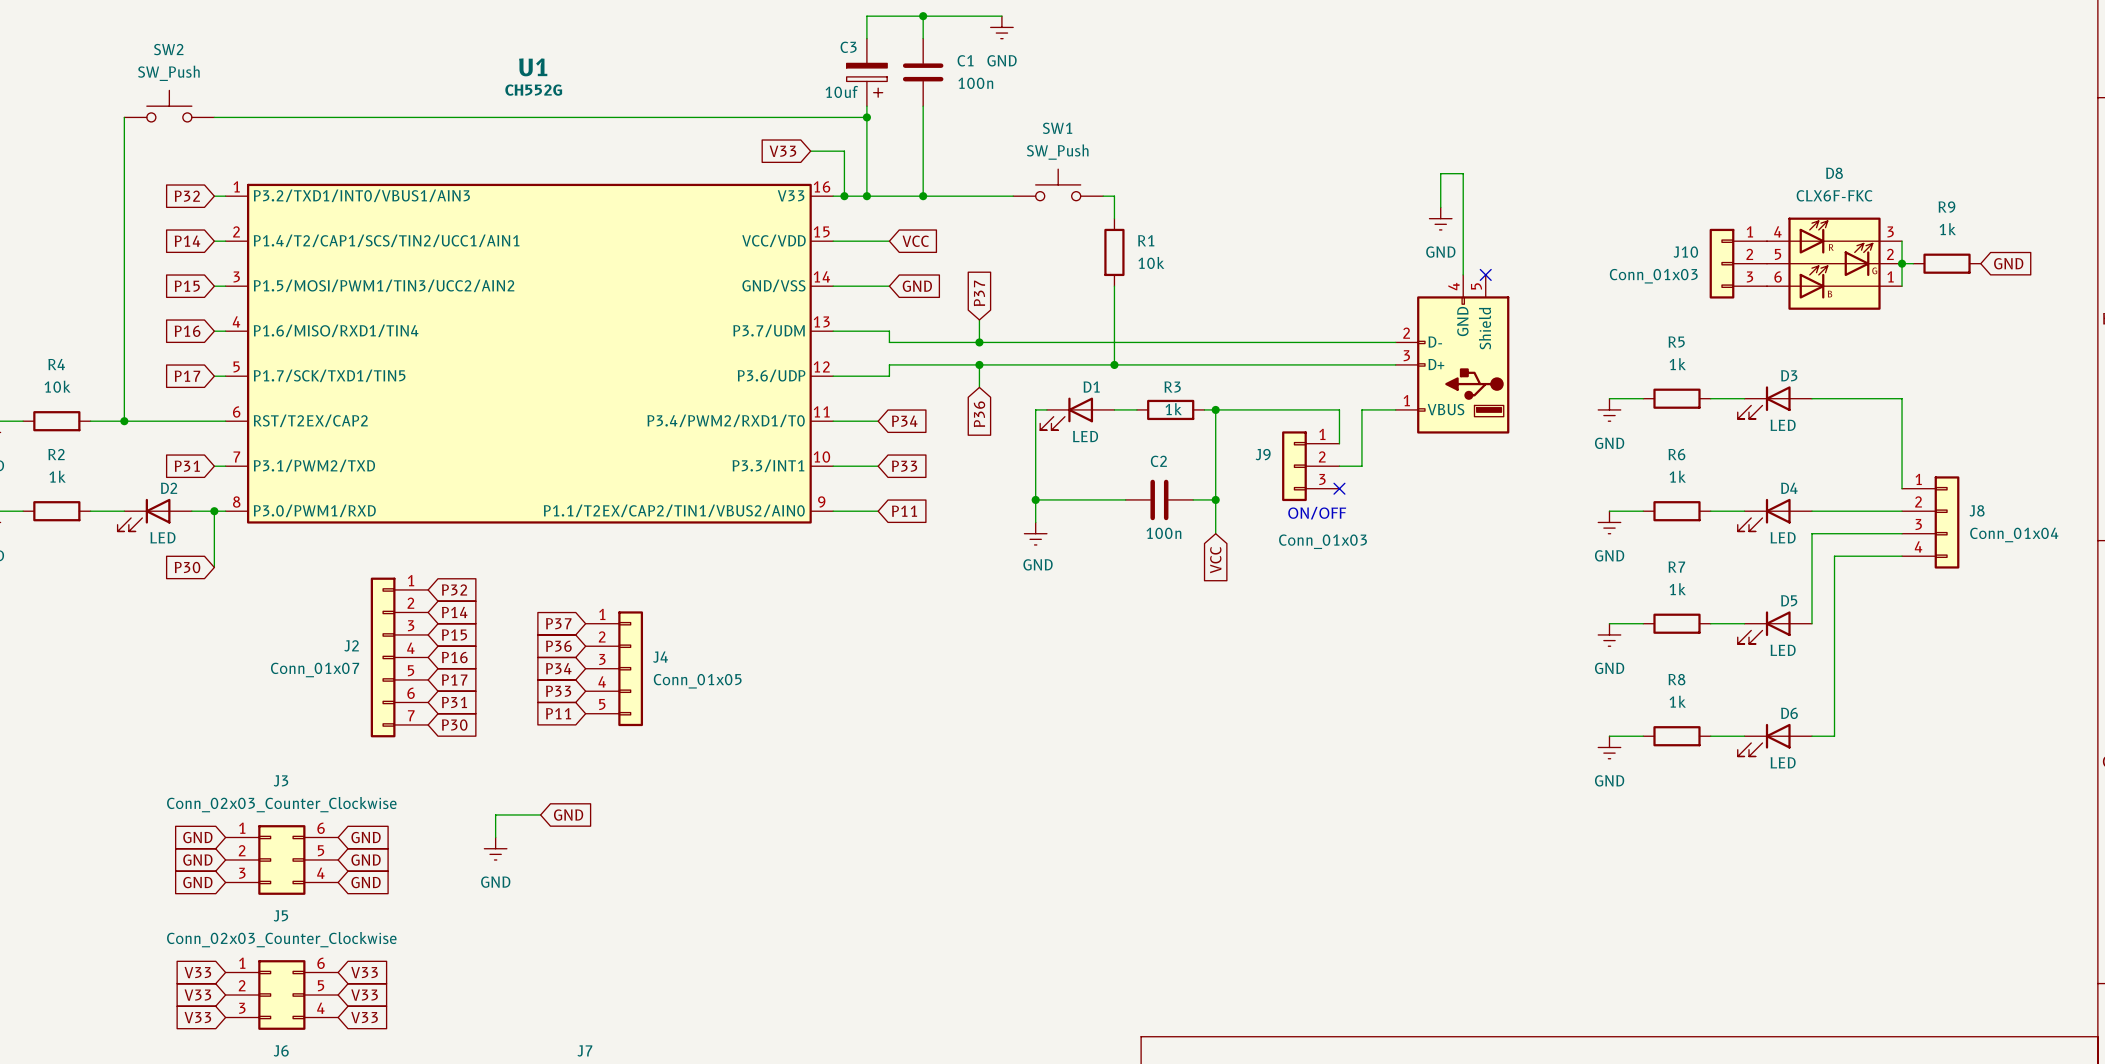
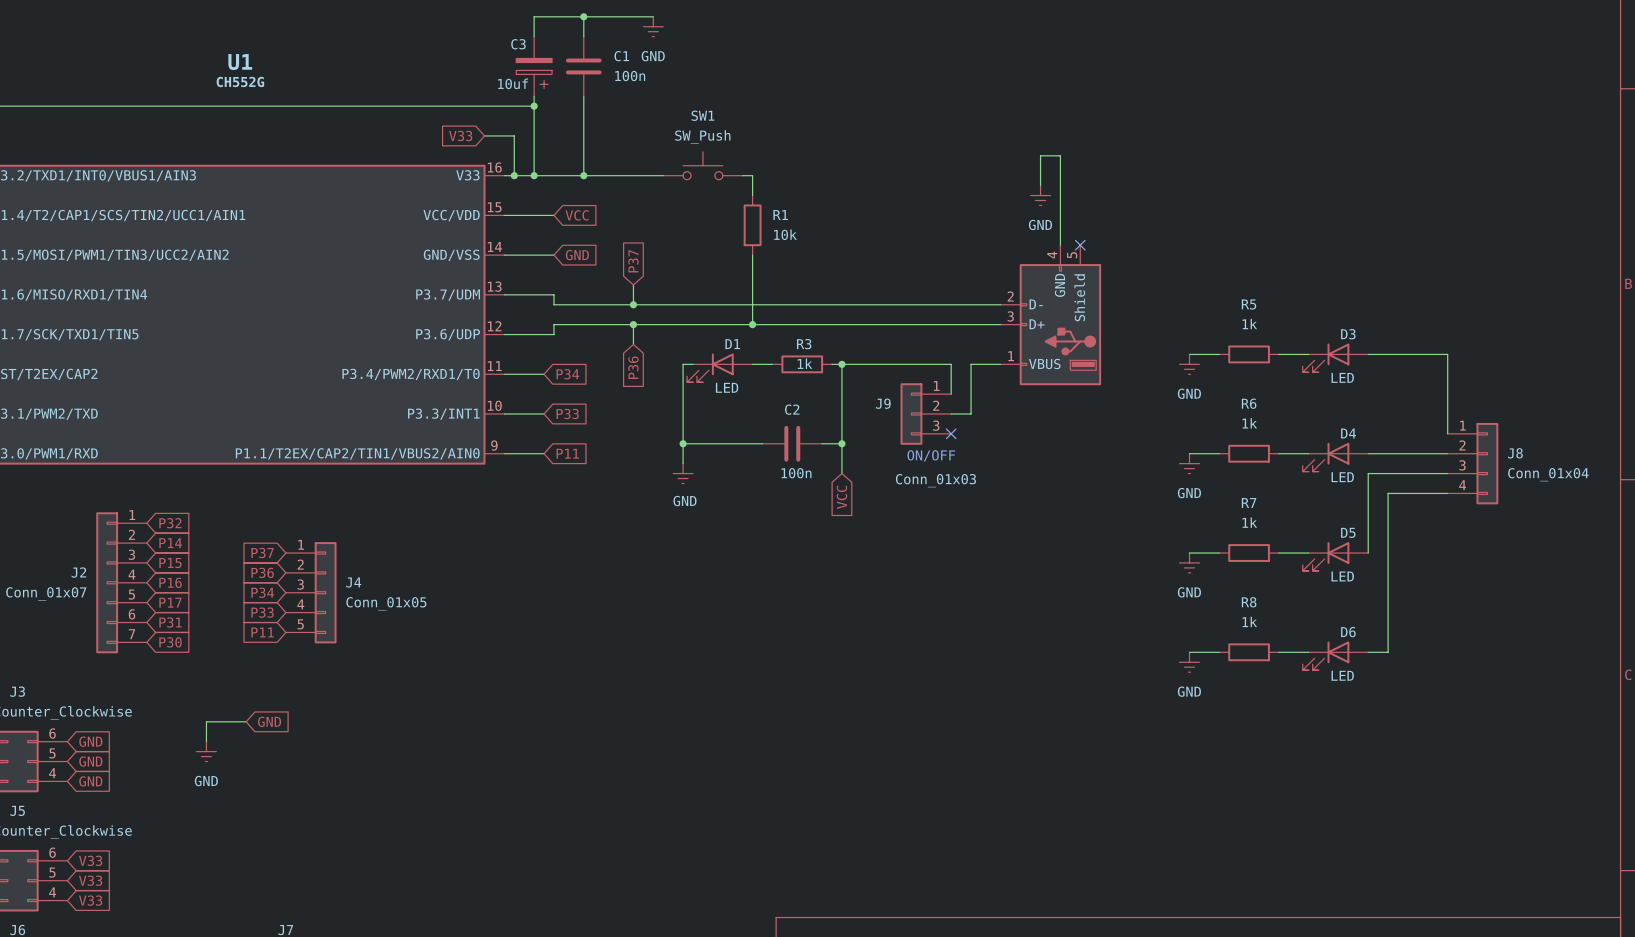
wire: (1902, 241) (1902, 286) -> none
J10: Conn_01x03 (1738, 263) -> none
D8: CLX6F-FKC (1834, 263) -> none
wire: (1902, 263) (1913, 263) -> none
junction: (1902, 263) -> none
R9: 1k (1947, 263) -> none
global label: GND (2008, 263) -> none

